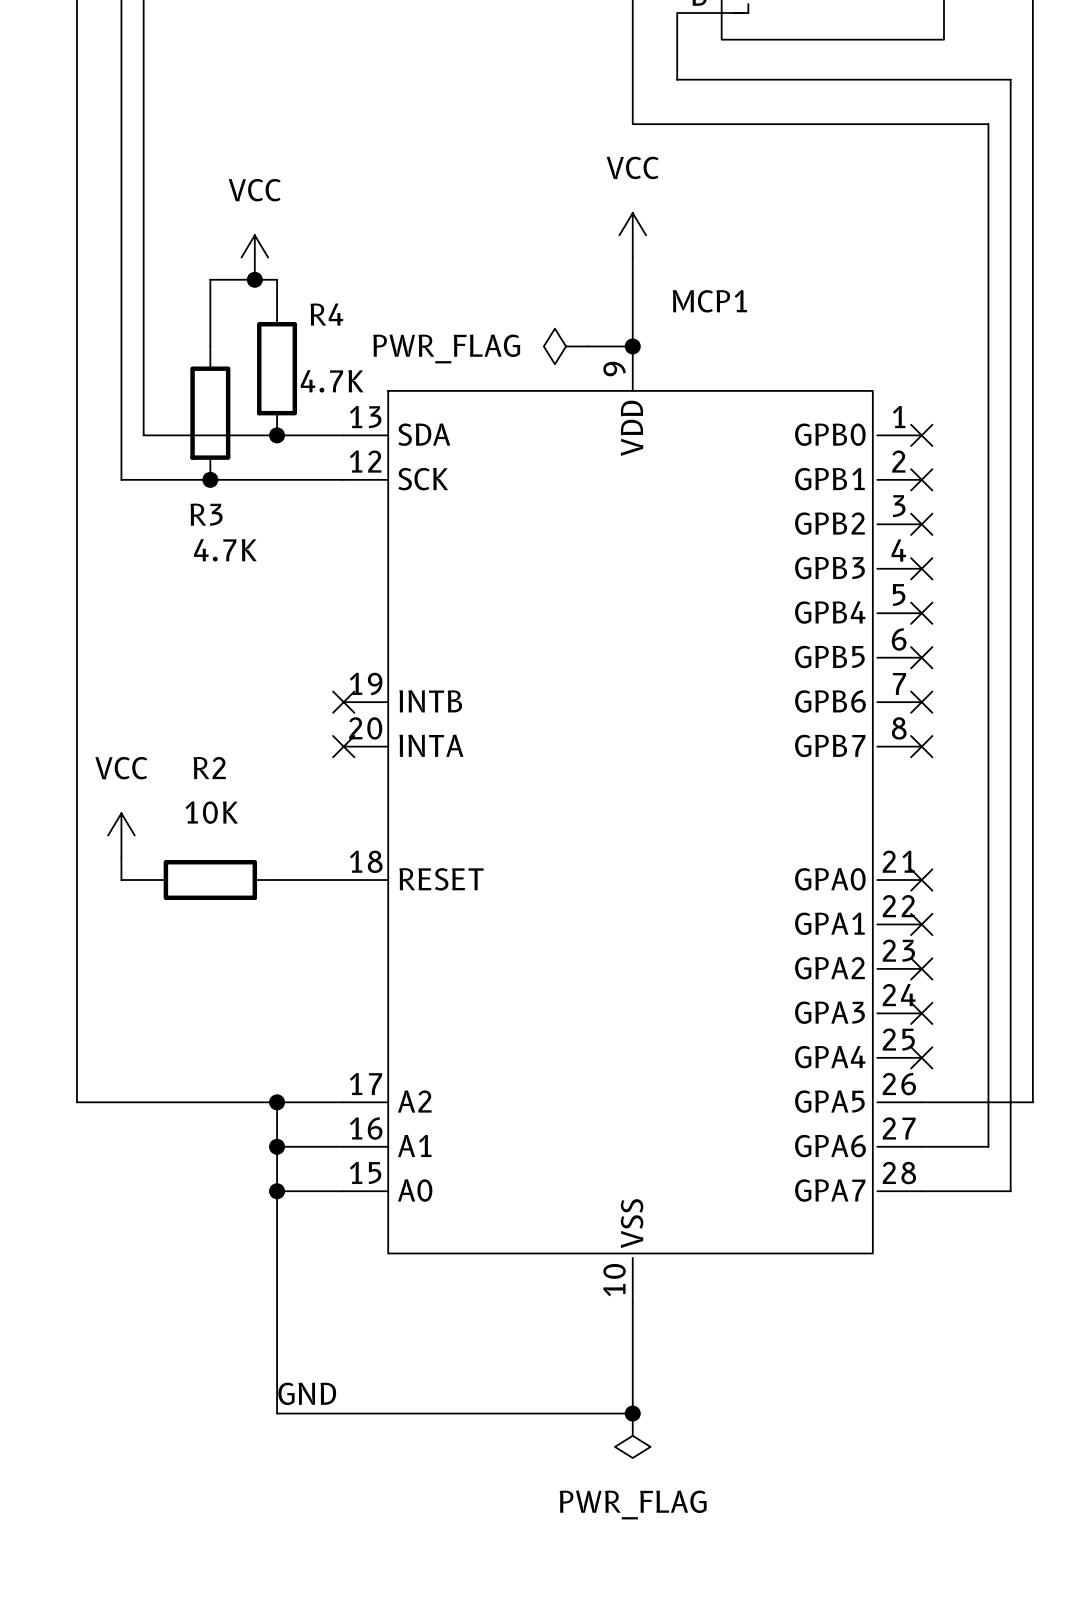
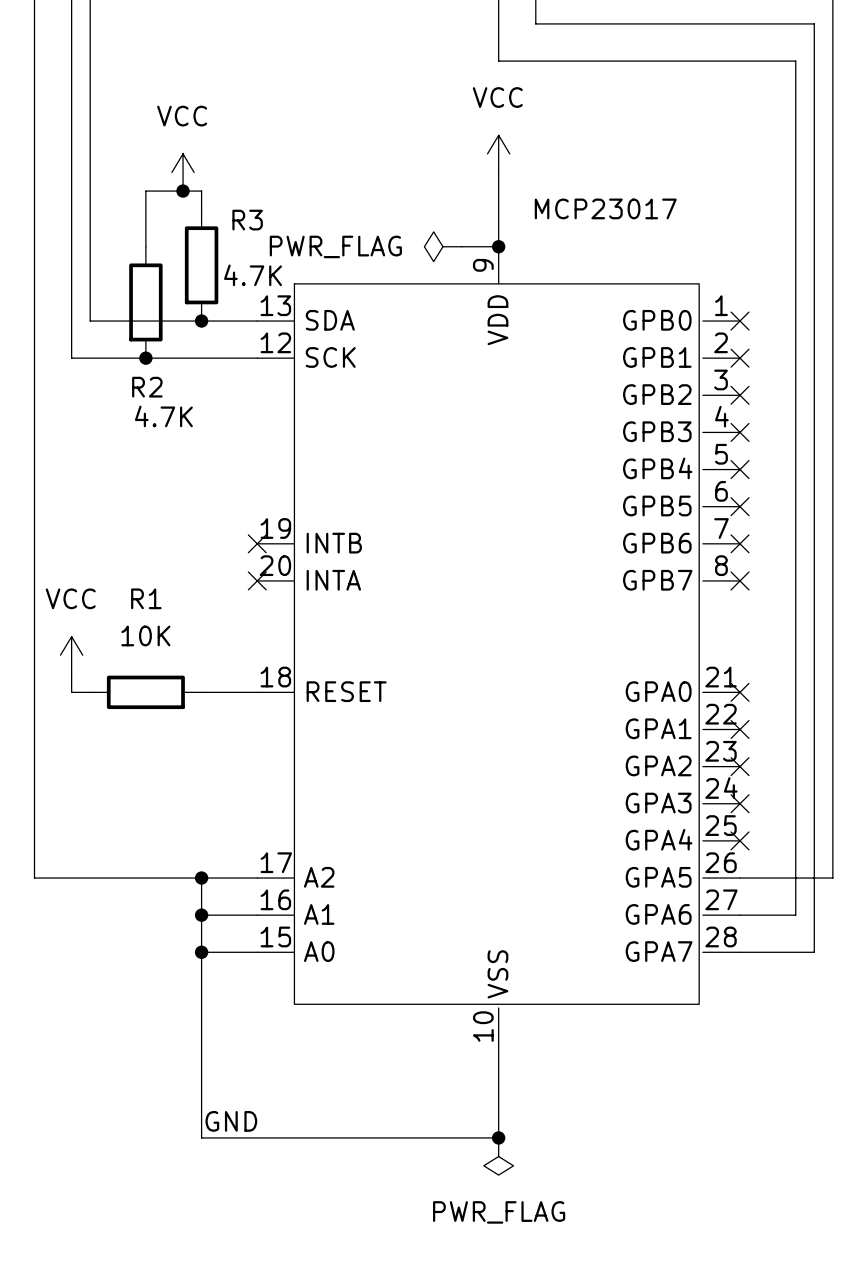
MCP1 name: MCP1 (709, 301) -> MCP23017 (605, 208)
R4 name: R4 (326, 314) -> R3 (247, 220)
R3 name: R3 (206, 514) -> R2 (147, 387)
R2 name: R2 (209, 768) -> R1 (146, 598)

